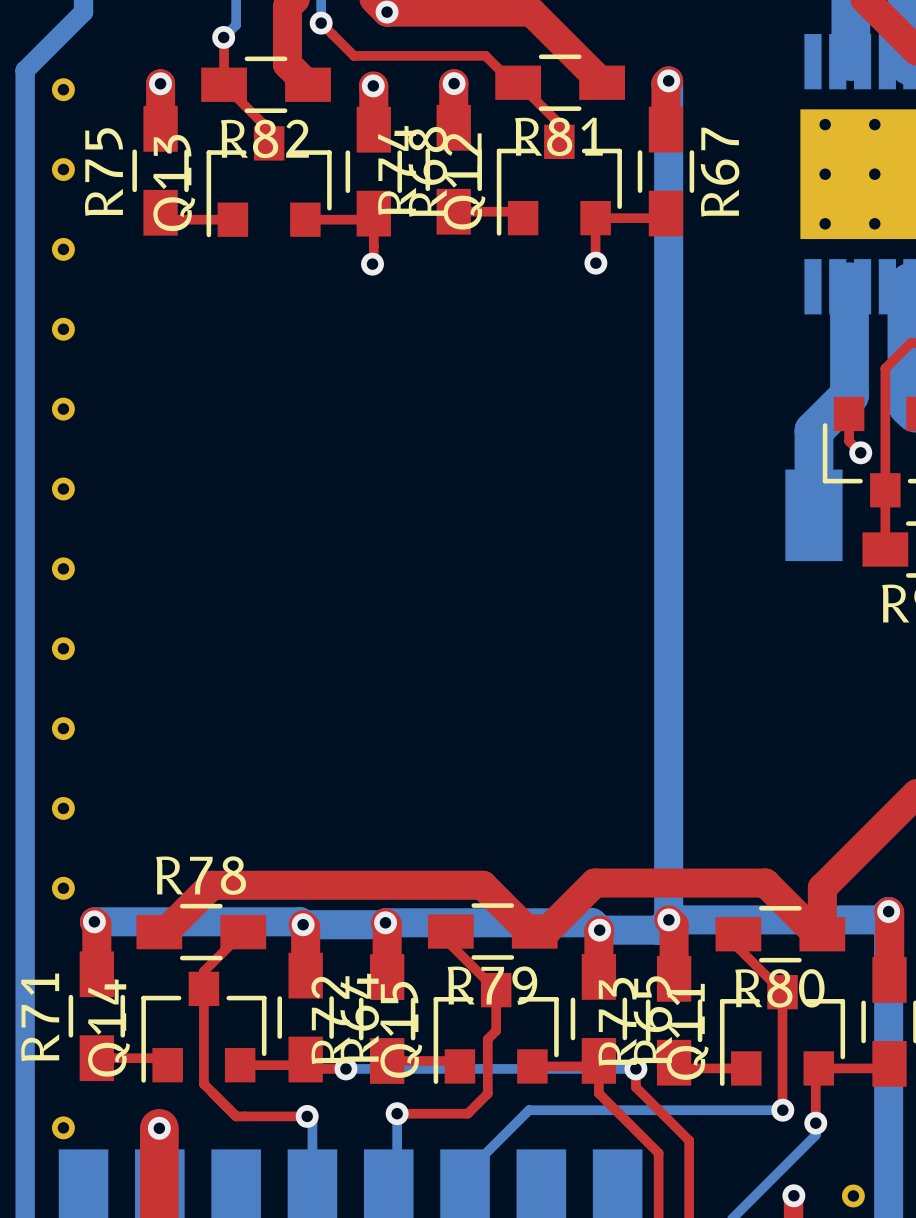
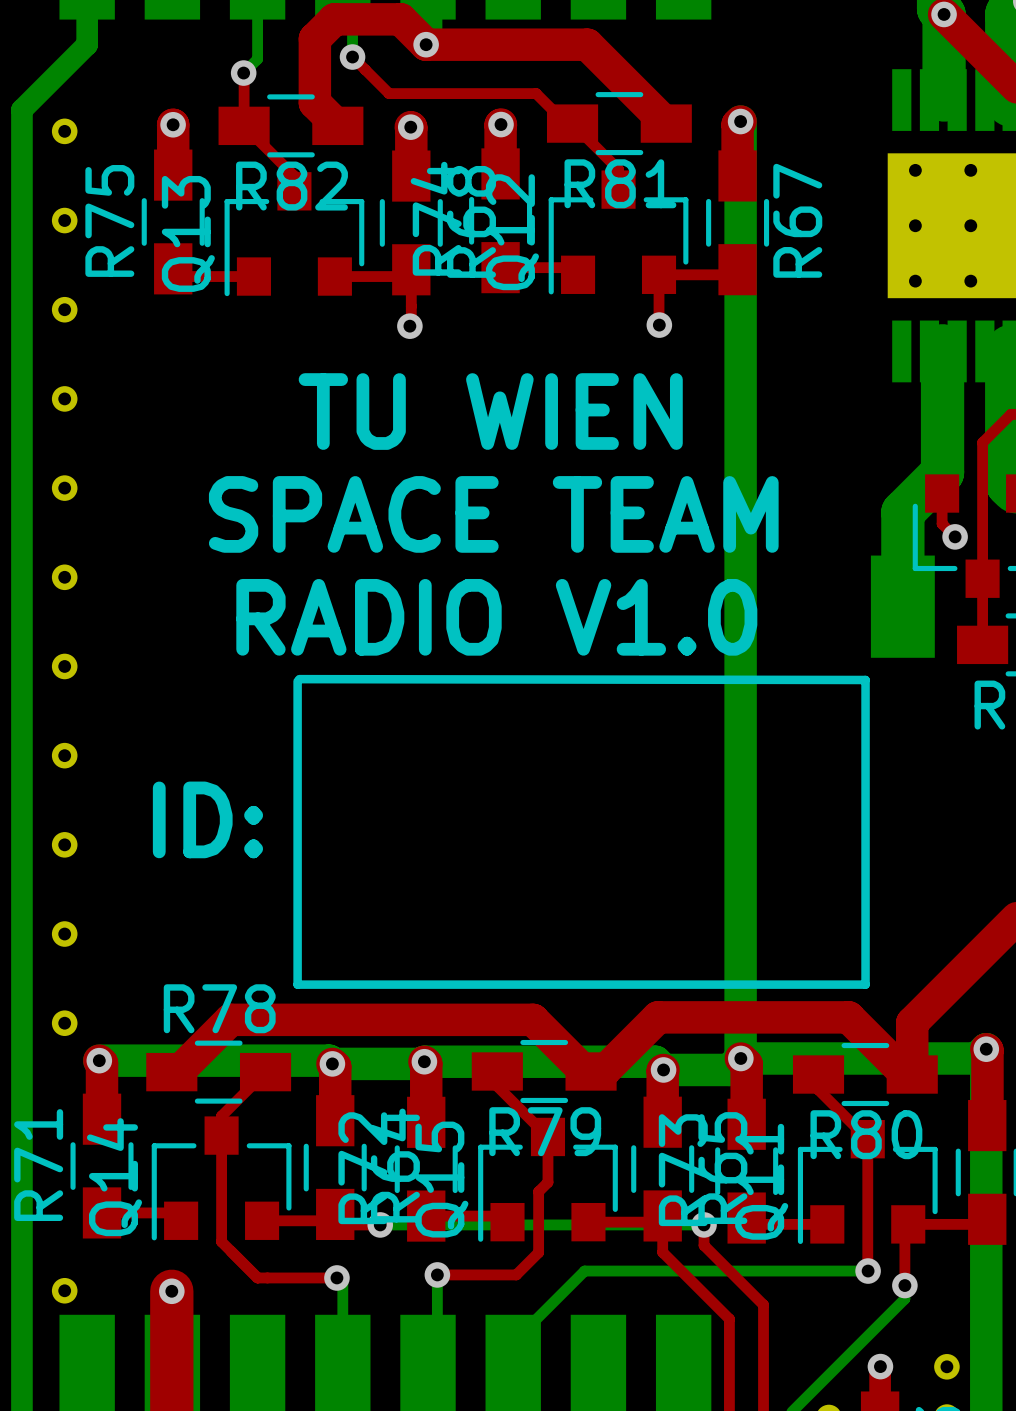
text: none -> TU WIEN (490, 411)
text: none -> SPACE TEAM (493, 514)
text: none -> RADIO V1.0 (496, 617)
line: none -> (299, 679) (865, 679) (865, 984) (297, 984) (297, 681)
text: none -> ID: (207, 819)

